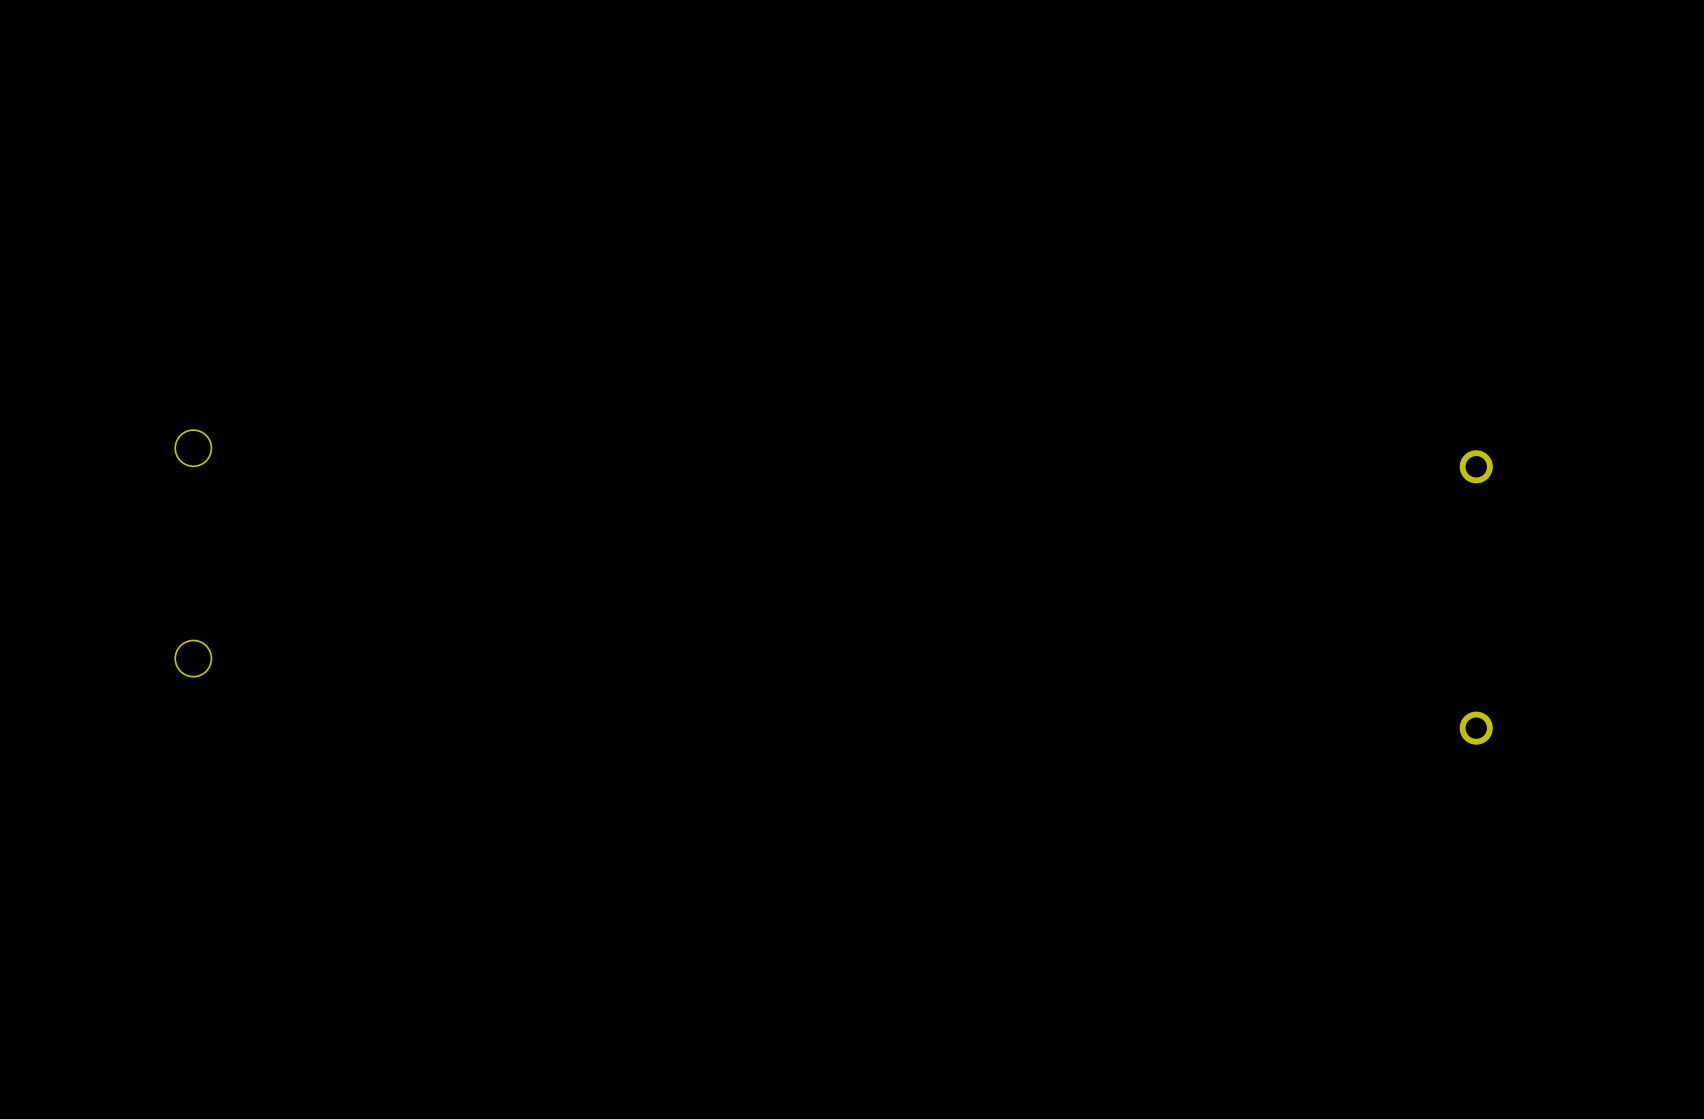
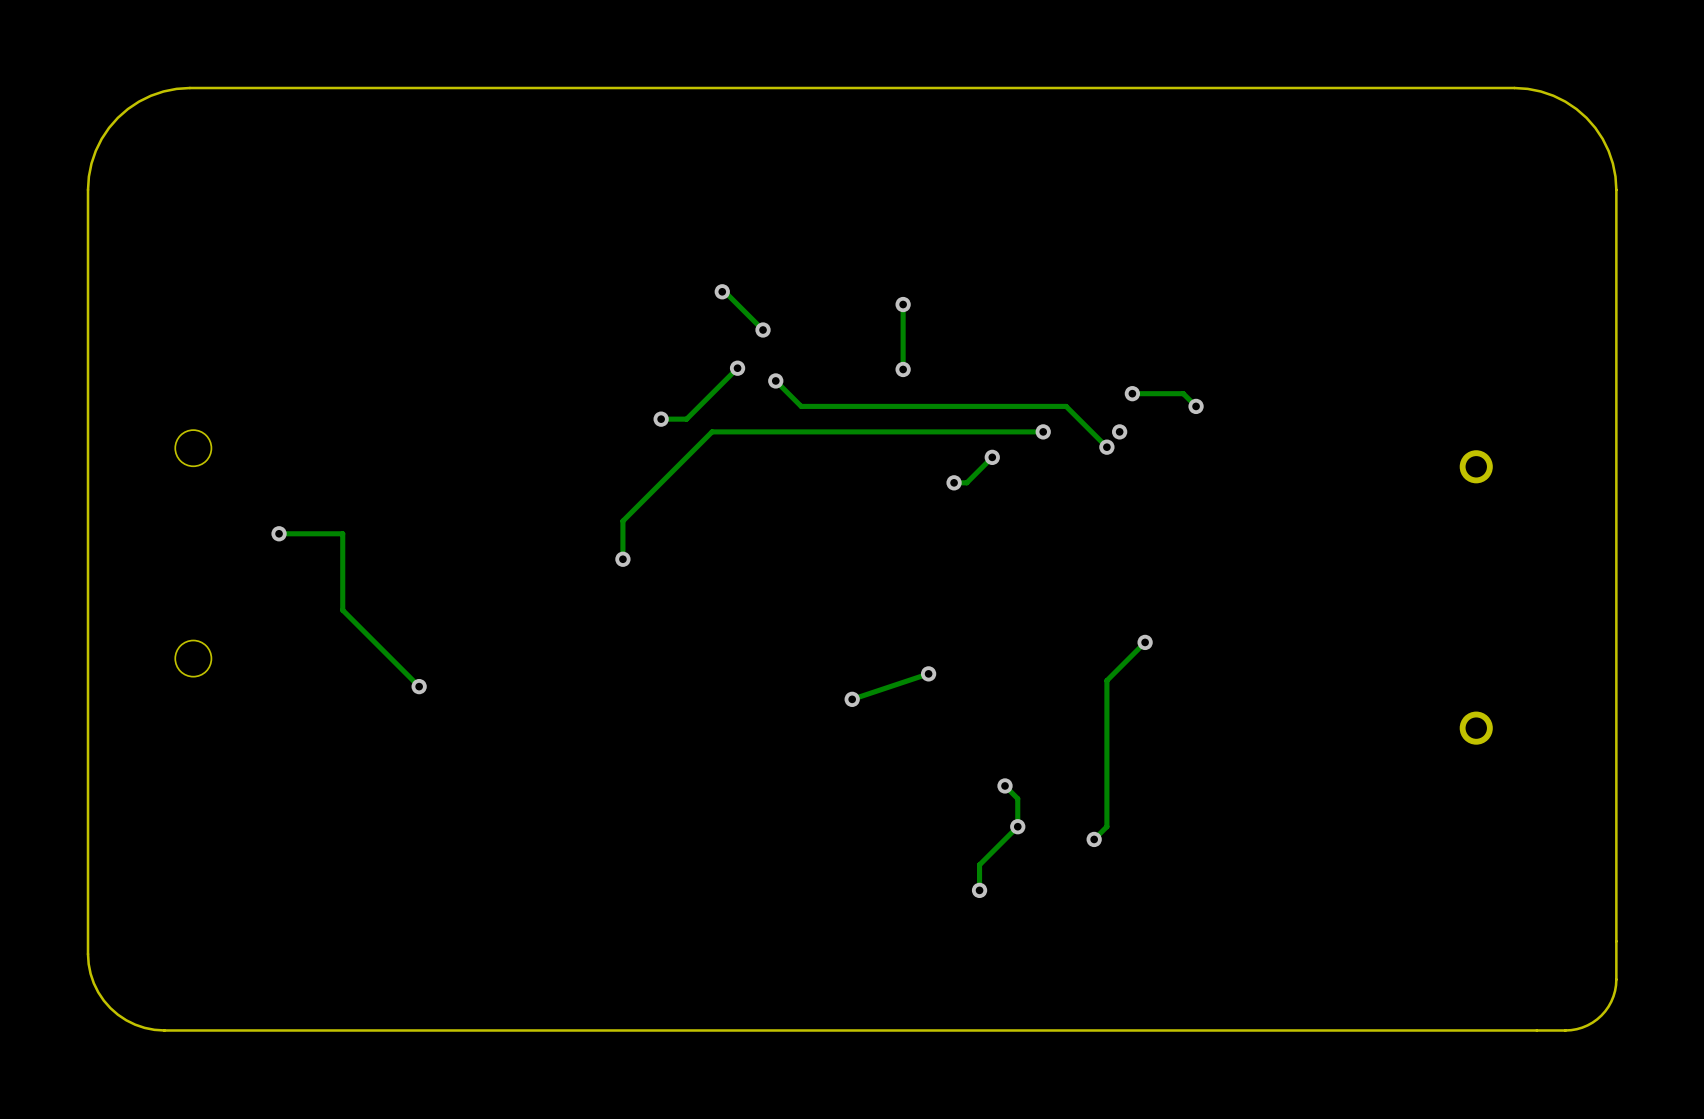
board edge: none -> (1514, 88) (189, 88) (163, 91) (138, 101) (117, 117) (101, 138) (91, 163) (88, 189) (88, 954) (90, 973) (98, 992) (110, 1008) (126, 1020) (144, 1027) (164, 1030) (1565, 1030) (1582, 1027) (1592, 1022) (1601, 1015) (1611, 1001) (1616, 979) (1615, 176) (1612, 163) (1602, 138) (1586, 117) (1576, 109) (1565, 101) (1540, 91) (1514, 88)
track: none -> (722, 291) (724, 291) (763, 330)
via: none -> (722, 291)
track: none -> (903, 304) (903, 369)
via: none -> (903, 304)
via: none -> (763, 330)
track: none -> (737, 368) (686, 419) (661, 419)
via: none -> (737, 368)
via: none -> (903, 369)
track: none -> (775, 380) (801, 406) (1066, 406) (1106, 447)
via: none -> (775, 380)
track: none -> (1132, 393) (1183, 393) (1196, 406)
via: none -> (1132, 393)
via: none -> (1196, 406)
via: none -> (661, 419)
track: none -> (1043, 431) (712, 431) (622, 521) (622, 559)
via: none -> (1043, 431)
via: none -> (1119, 431)
via: none -> (1106, 447)
track: none -> (992, 457) (966, 482) (954, 482)
via: none -> (992, 457)
via: none -> (954, 482)
track: none -> (279, 533) (342, 533) (342, 610) (419, 686)
via: none -> (279, 533)
via: none -> (622, 559)
track: none -> (1145, 642) (1106, 680) (1106, 826) (1094, 839)
via: none -> (1145, 642)
track: none -> (928, 673) (852, 699)
via: none -> (928, 673)
via: none -> (419, 686)
via: none -> (852, 699)
track: none -> (1005, 785) (1017, 798) (1017, 826) (979, 864) (979, 890)
via: none -> (1005, 785)
via: none -> (1017, 826)
via: none -> (1094, 839)
via: none -> (979, 890)

